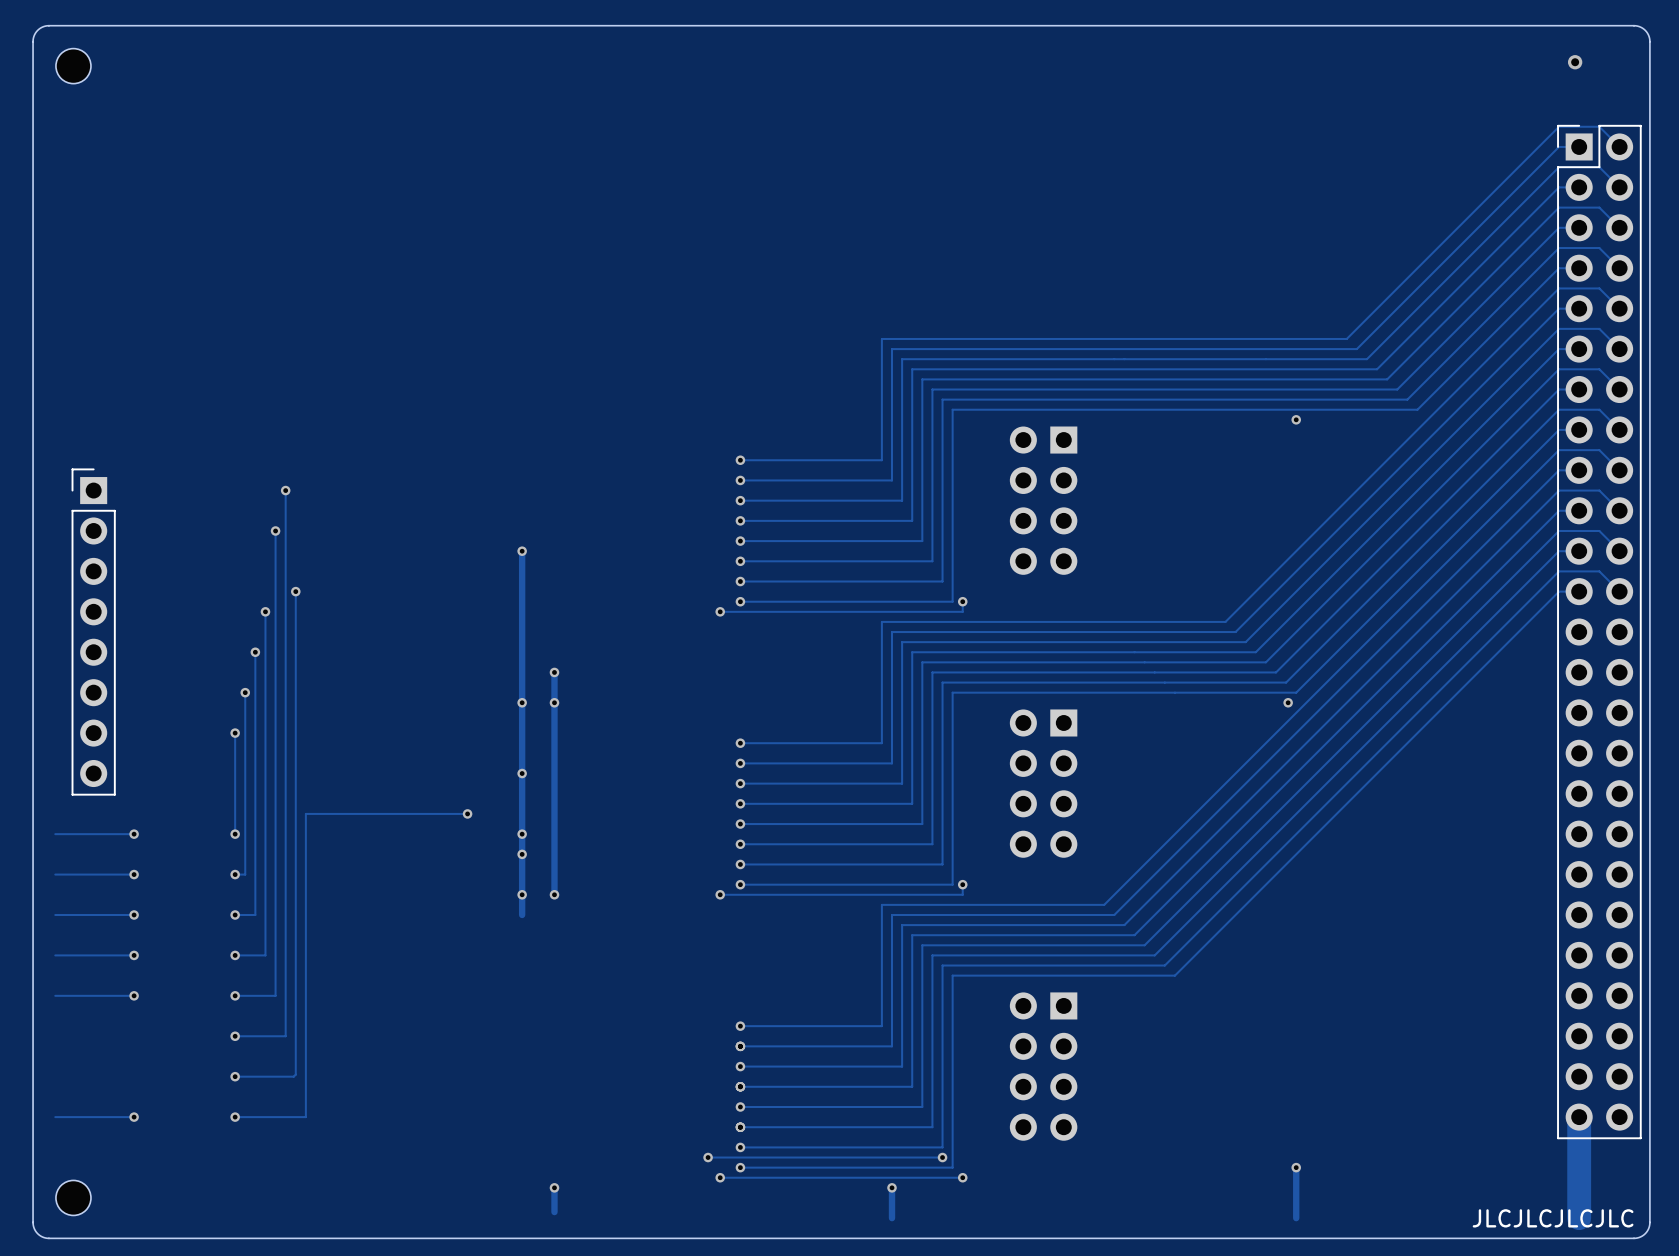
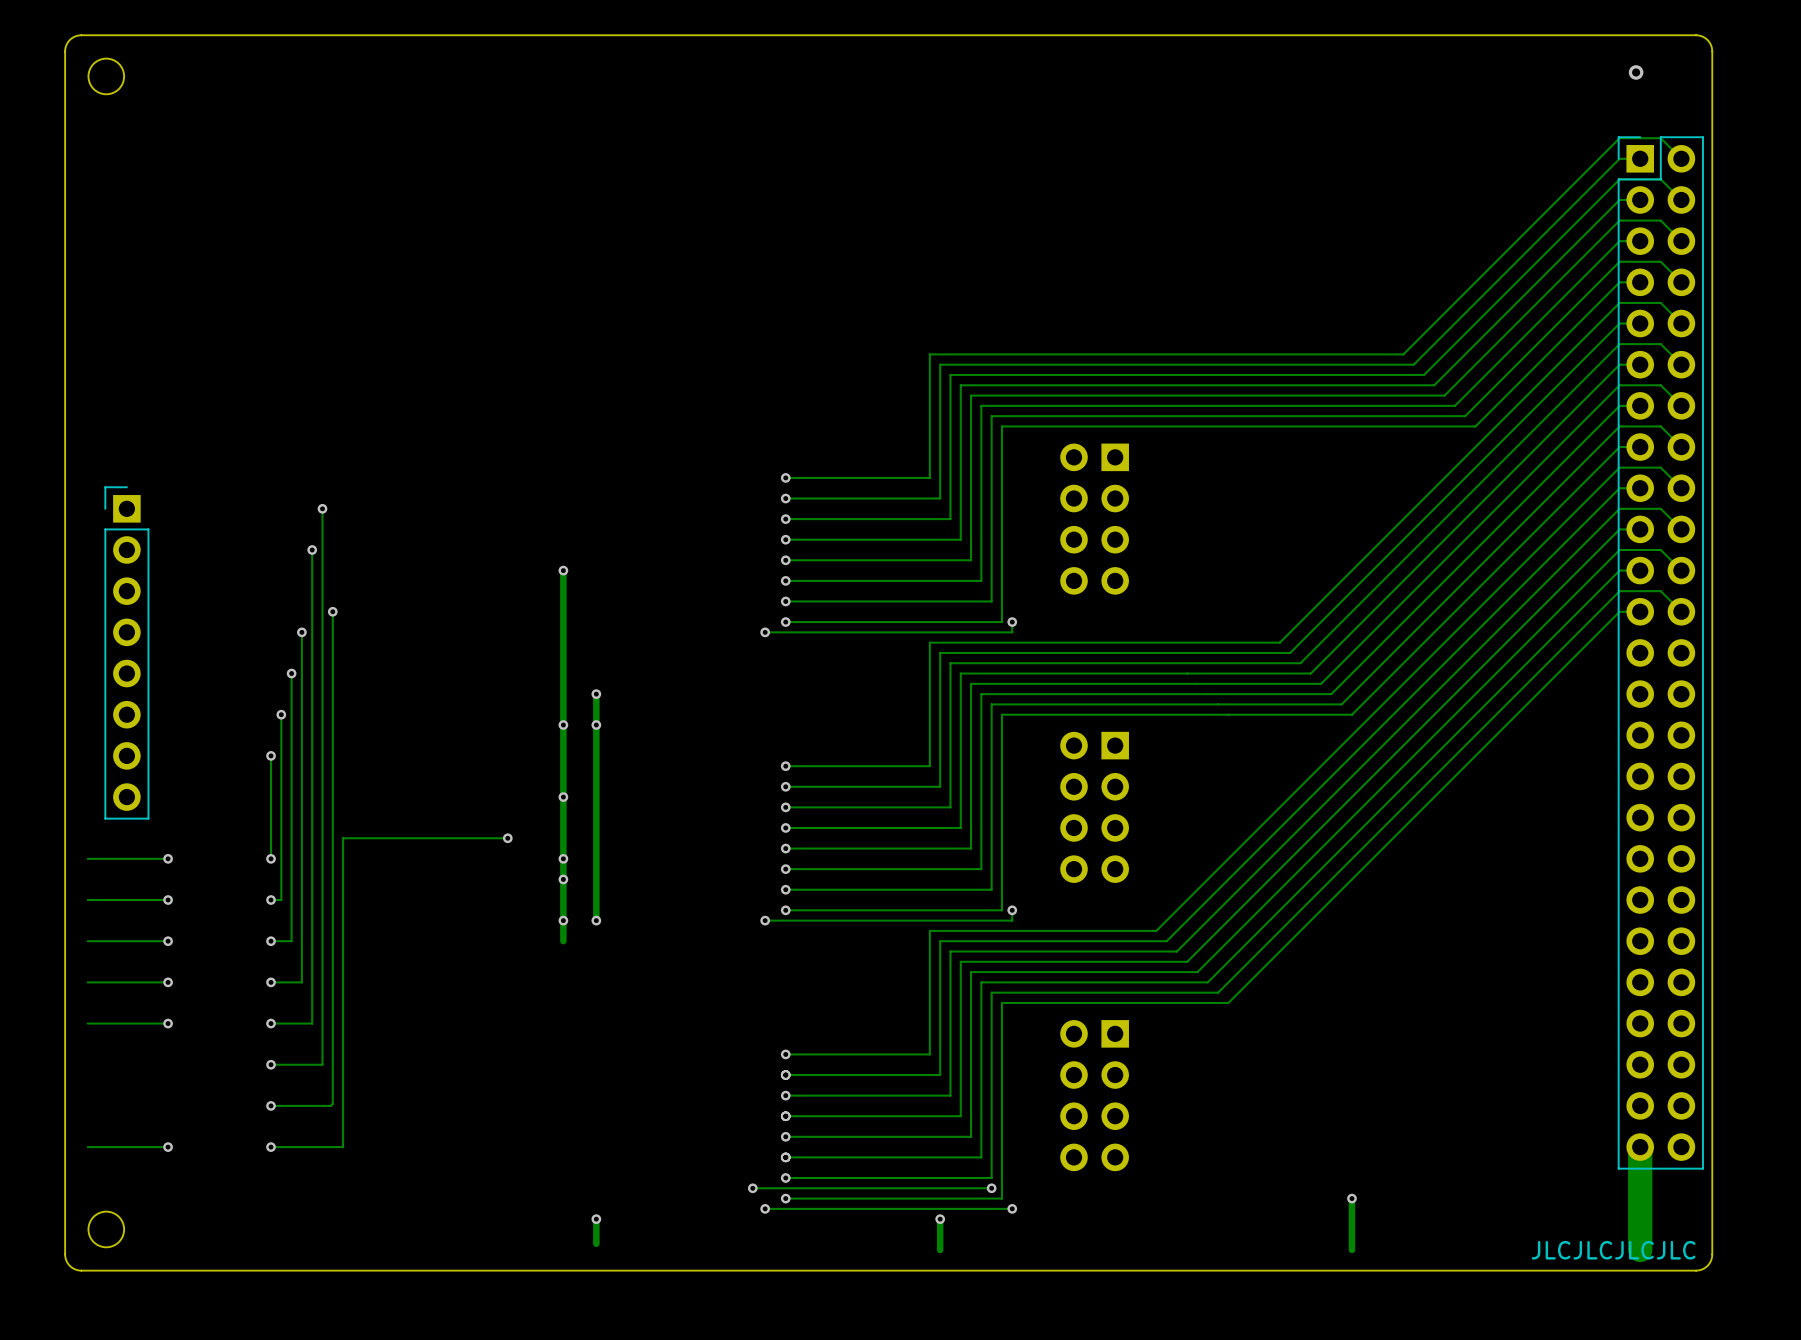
via: (1296, 419) -> none
via: (1288, 702) -> none

